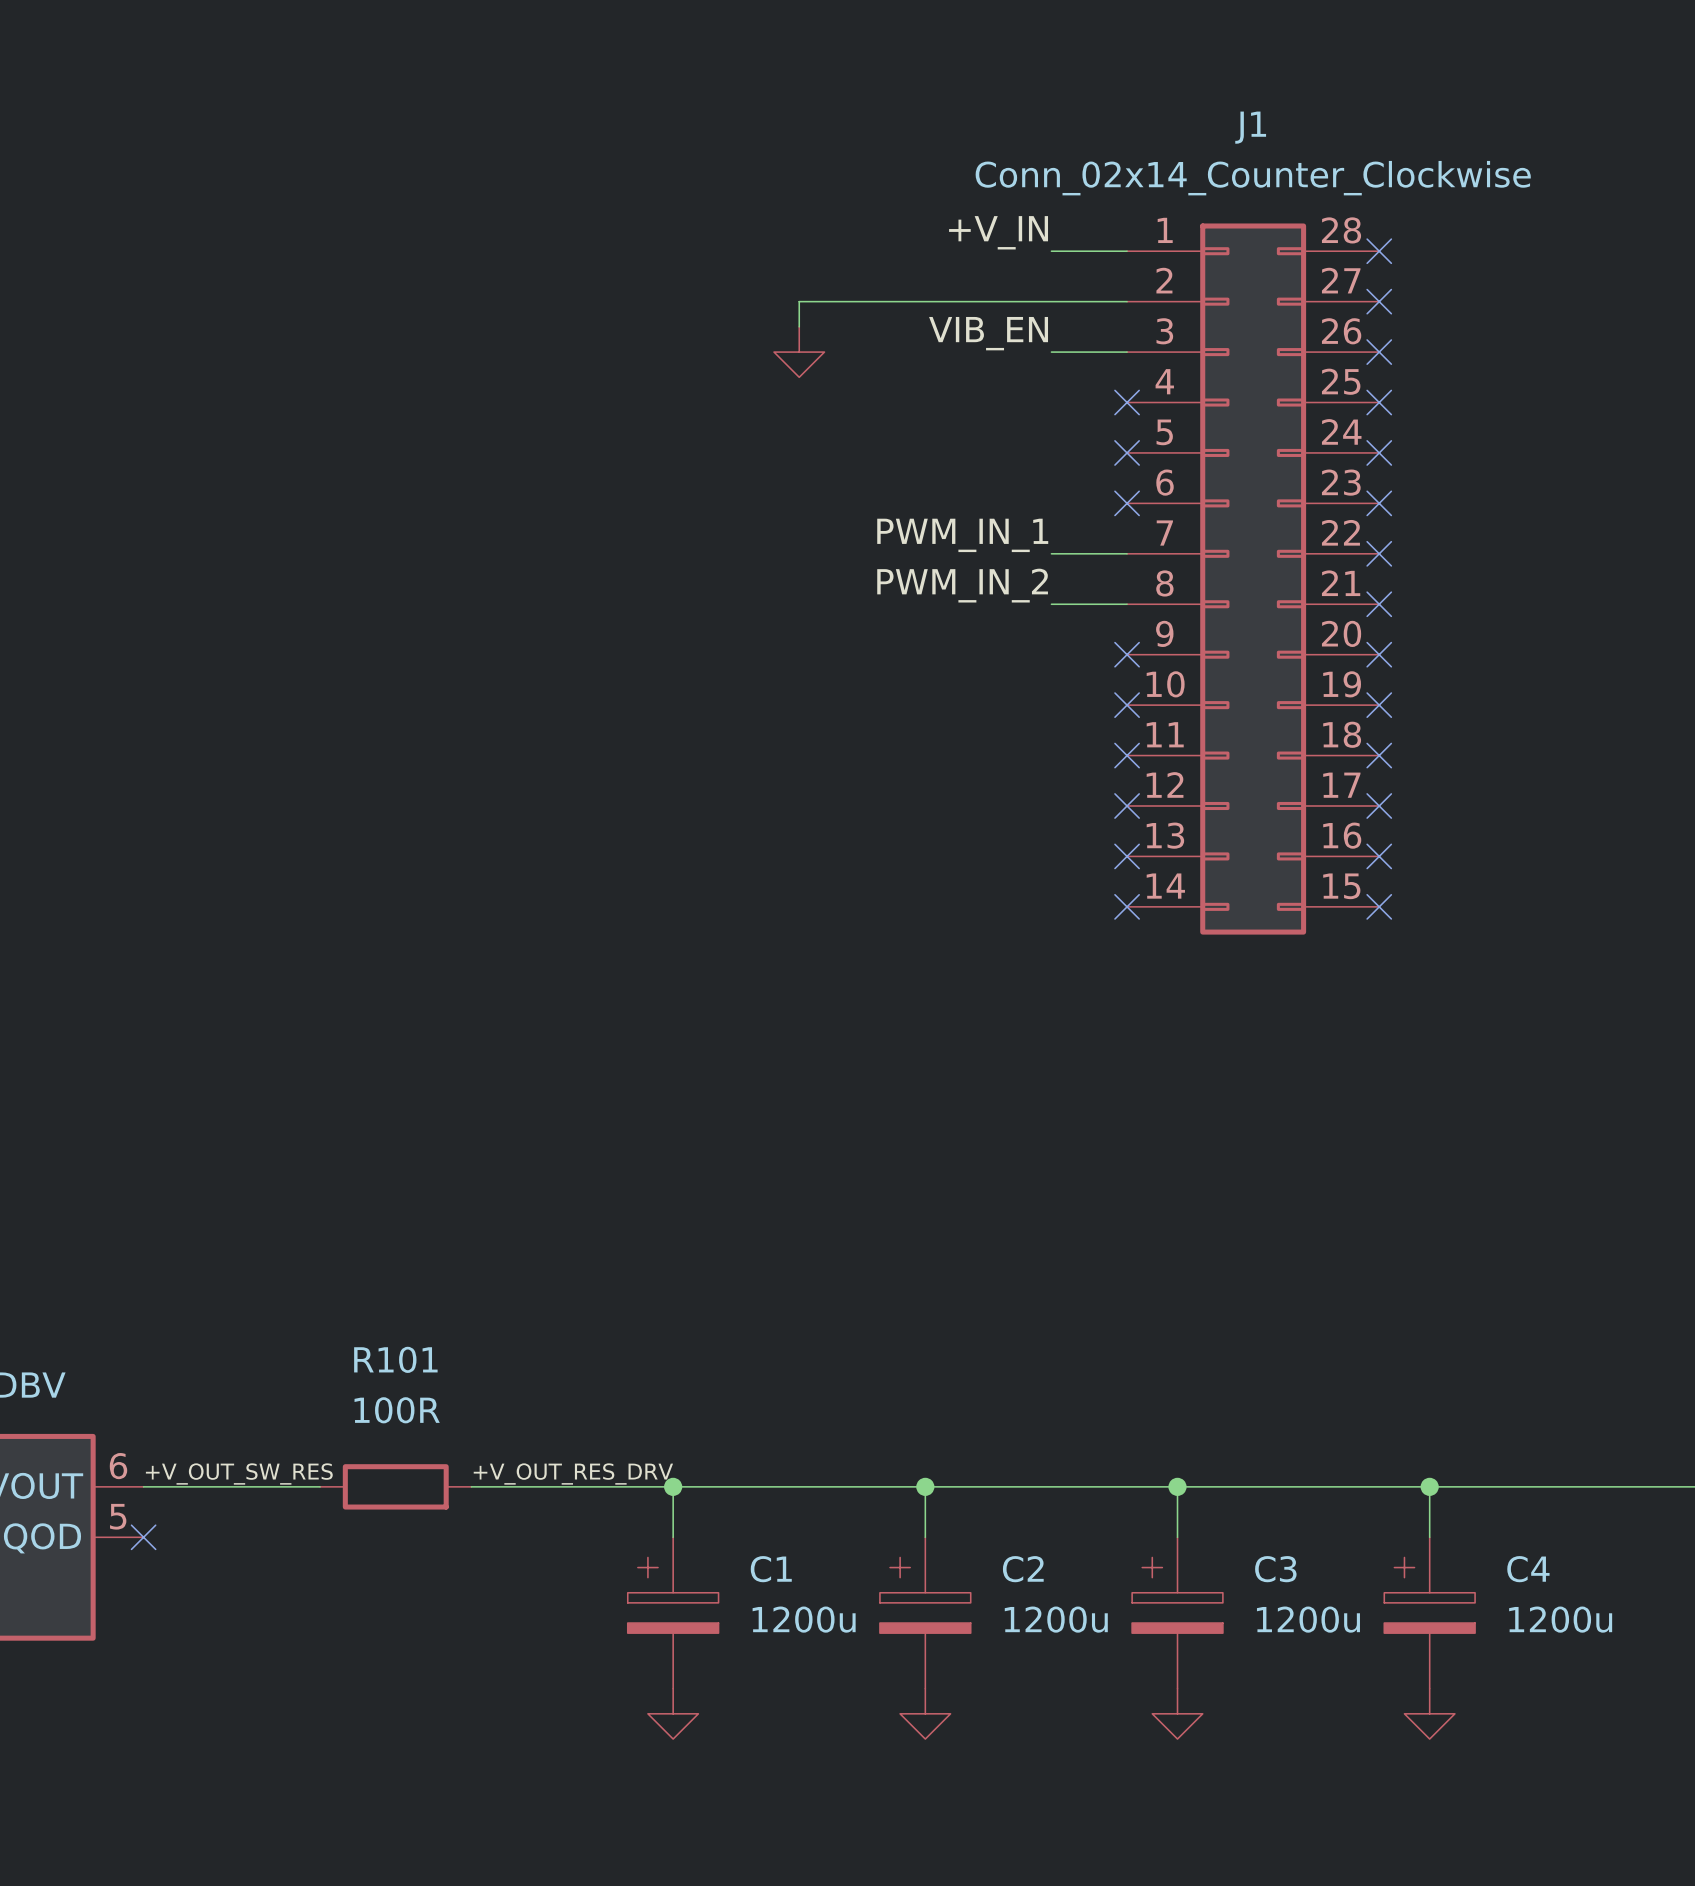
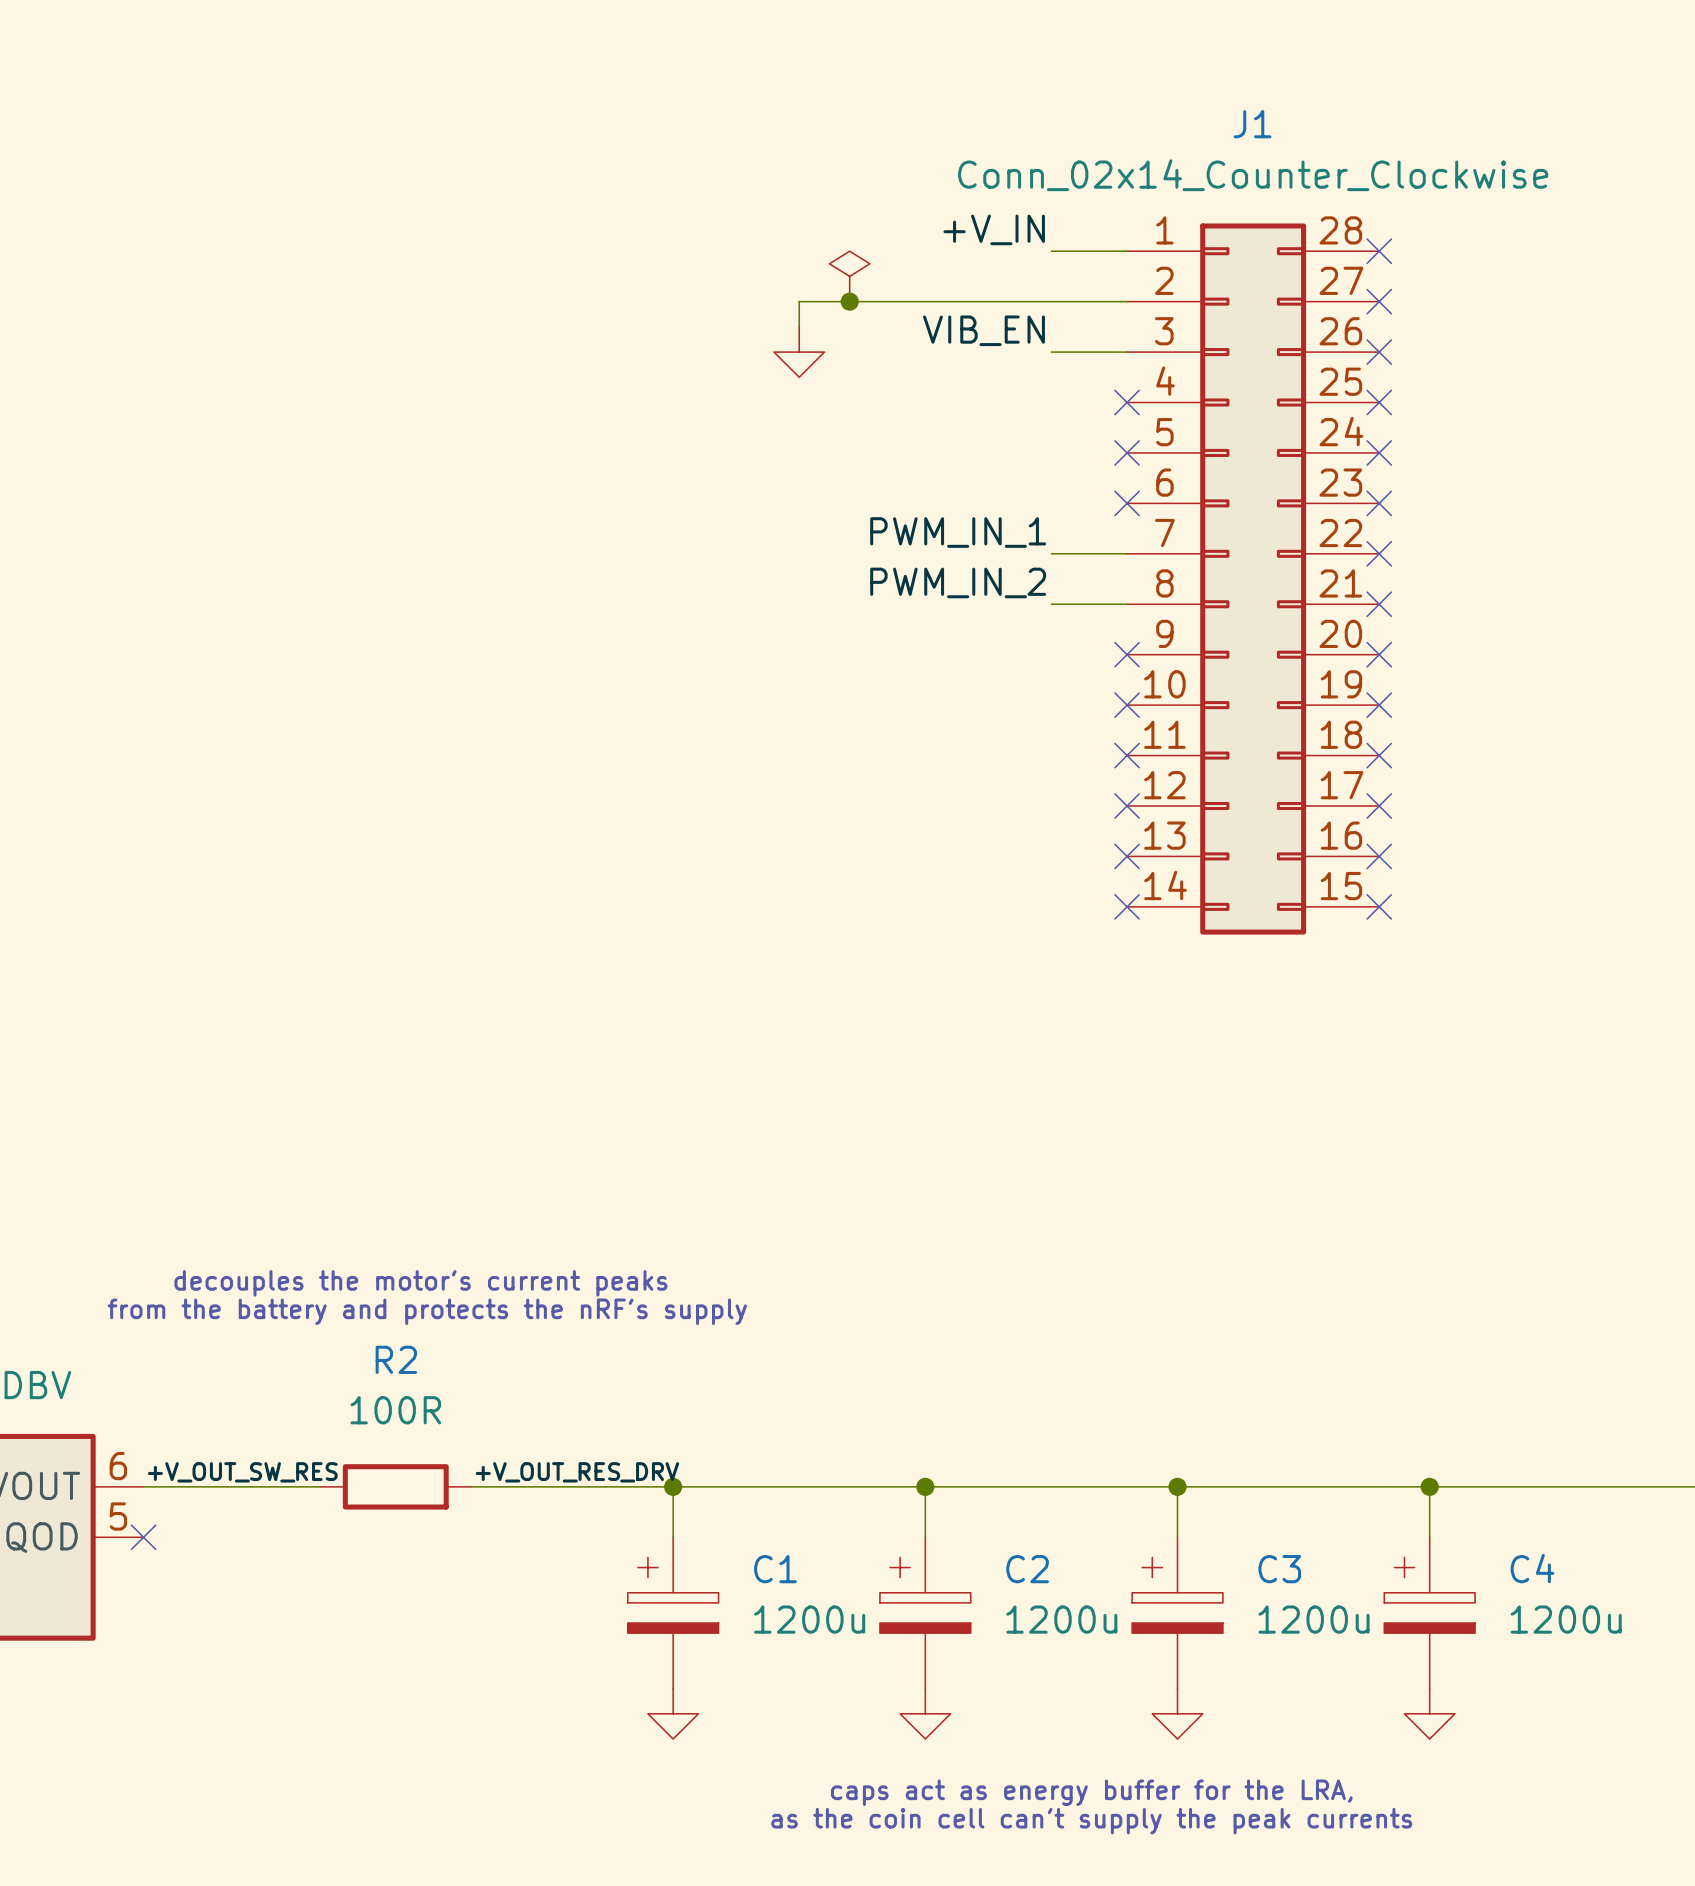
power symbol: none -> (849, 276)
junction: none -> (849, 301)
text: none -> decouples the motor's current peaks (420, 1283)
text: none -> from the battery and protects the nRF's supply (427, 1311)
R101 name: R101 (395, 1359) -> R2 (396, 1359)
text: none -> caps act as energy buffer for the LRA, (1091, 1792)
text: none -> as the coin cell can't supply the peak currents (1091, 1821)

